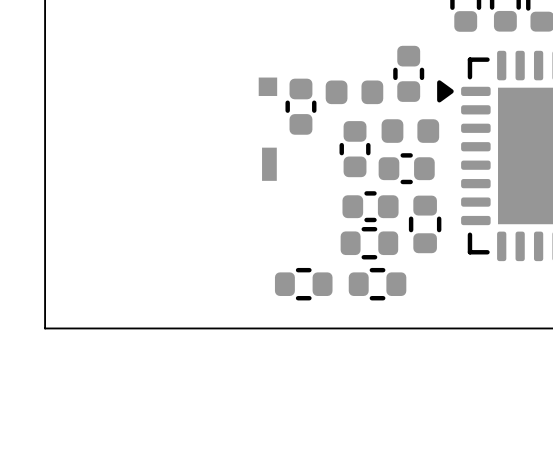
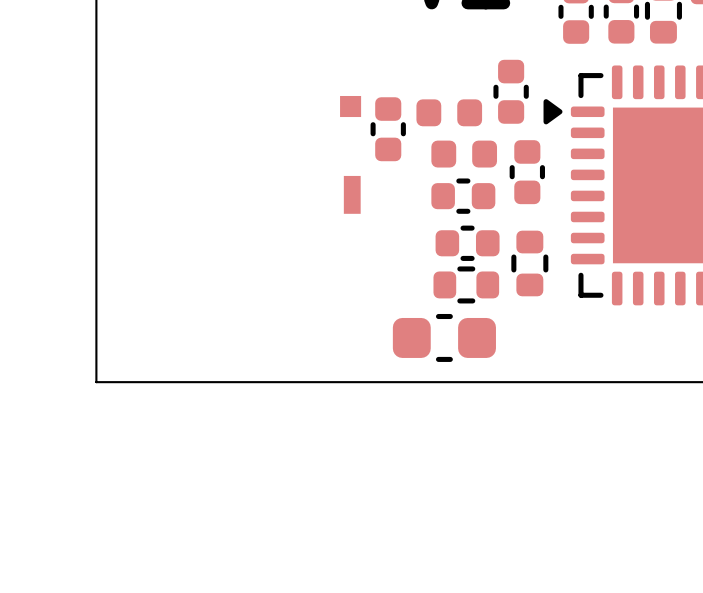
part position: (410, 131) -> (464, 154)
part: none -> (527, 172)
part: (355, 149) -> none
part: none -> (463, 196)
part: (406, 168) -> none
part: (303, 284) -> none
part: (377, 284) -> none
part: none -> (444, 337)

